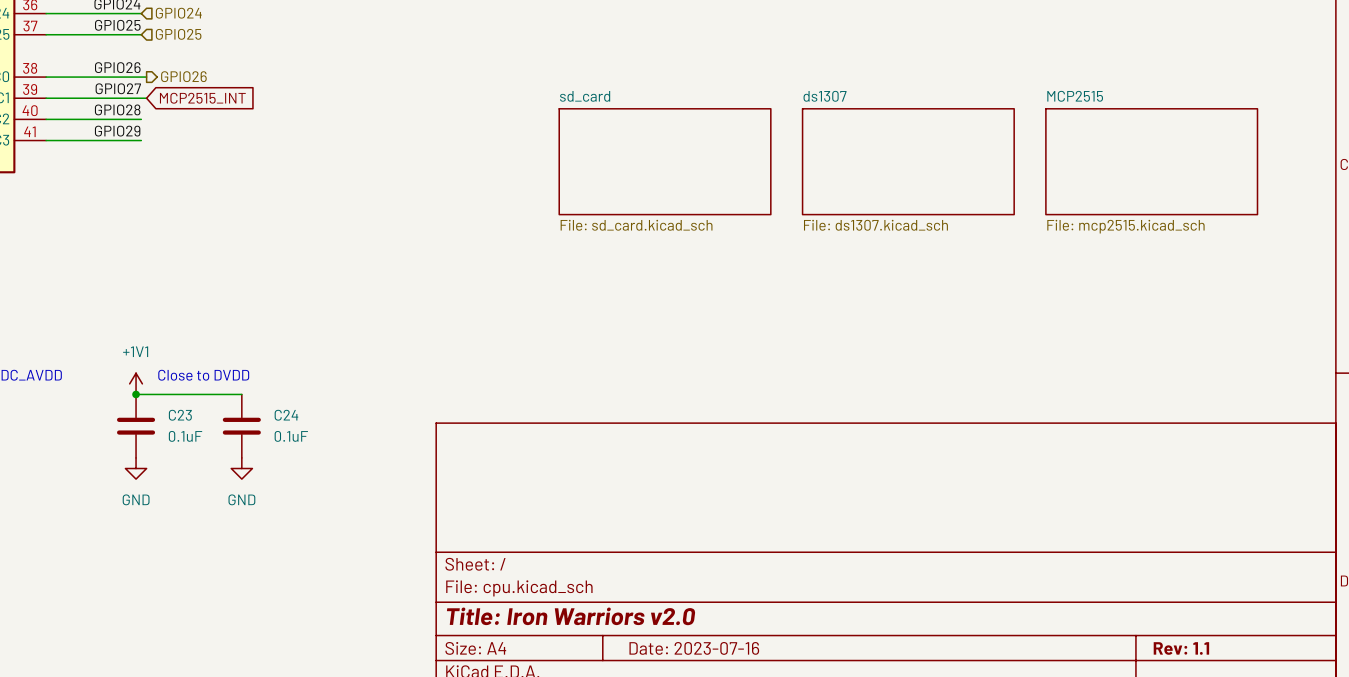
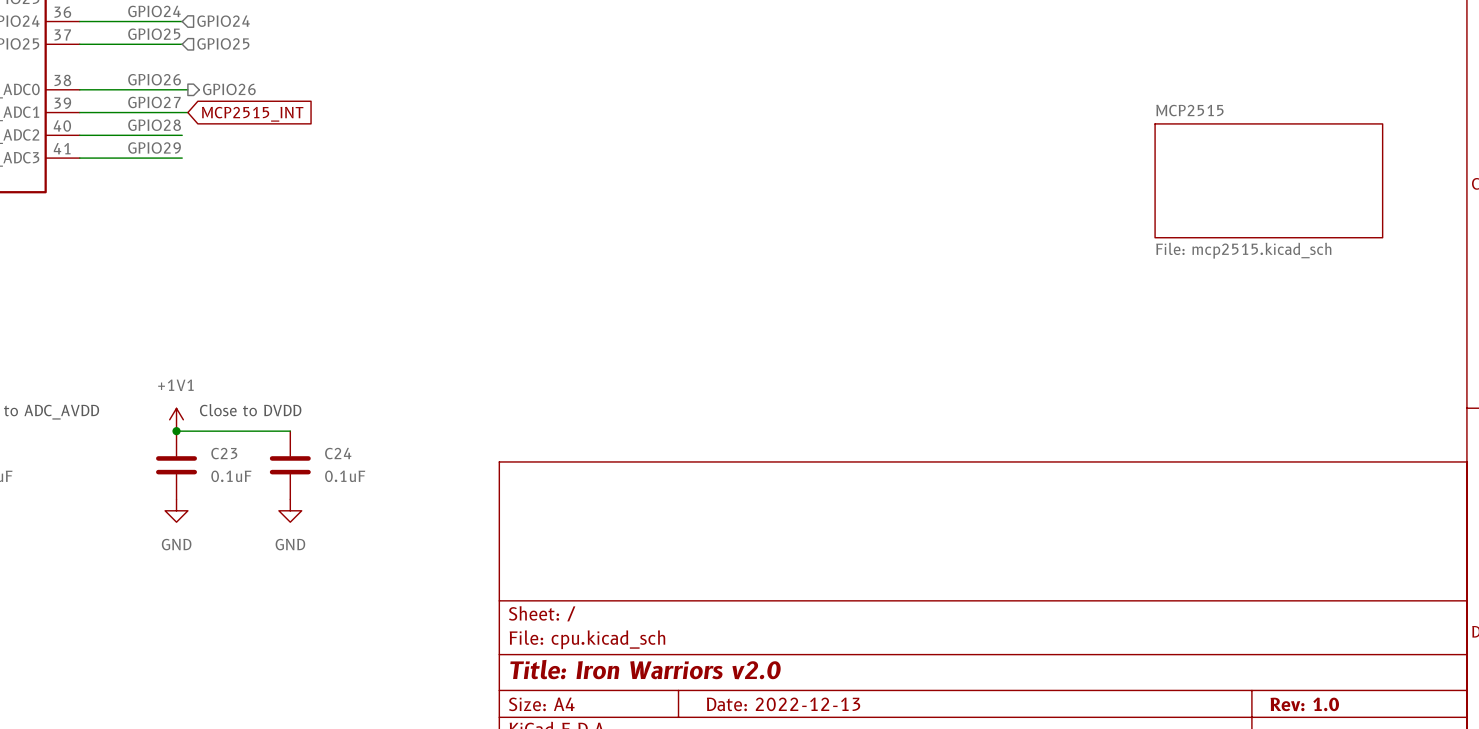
sheet sd_card: File: sd_card.kicad_sch (665, 161) -> none
sheet ds1307: File: ds1307.kicad_sch (908, 161) -> none
title block: Date: 2023-07-16 (694, 648) -> Date: 2022-12-13 (783, 704)
title block: Rev: 1.1 (1181, 648) -> Rev: 1.0 (1304, 704)

